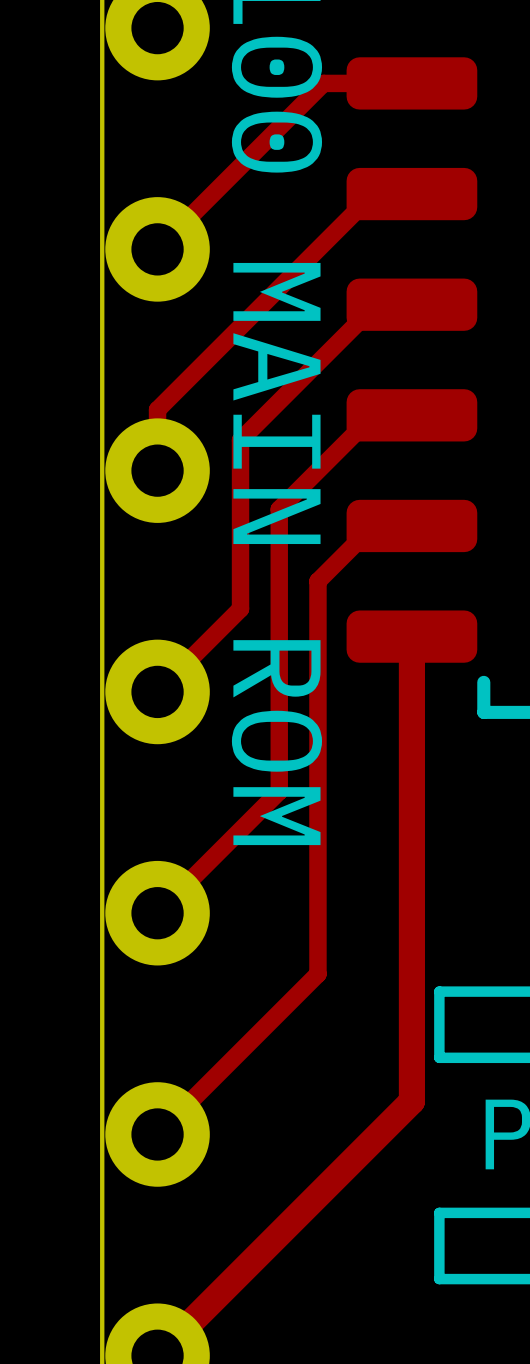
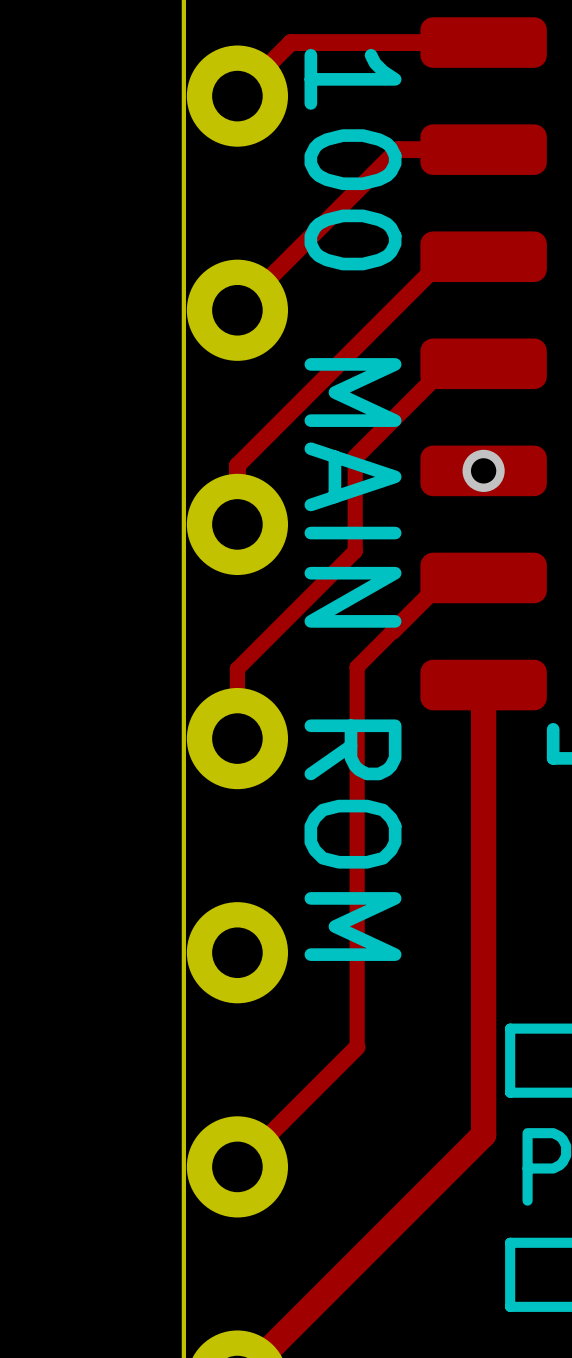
track: (279, 401) (240, 440) (240, 608) (157, 691) -> (355, 457) (355, 551) (237, 668) (237, 738)
track: (411, 415) (373, 415) (279, 509) (279, 791) (157, 913) -> none
via: none -> (483, 470)
track: (317, 581) (317, 974) (281, 1010) -> (392, 631) (357, 667) (357, 1047)

